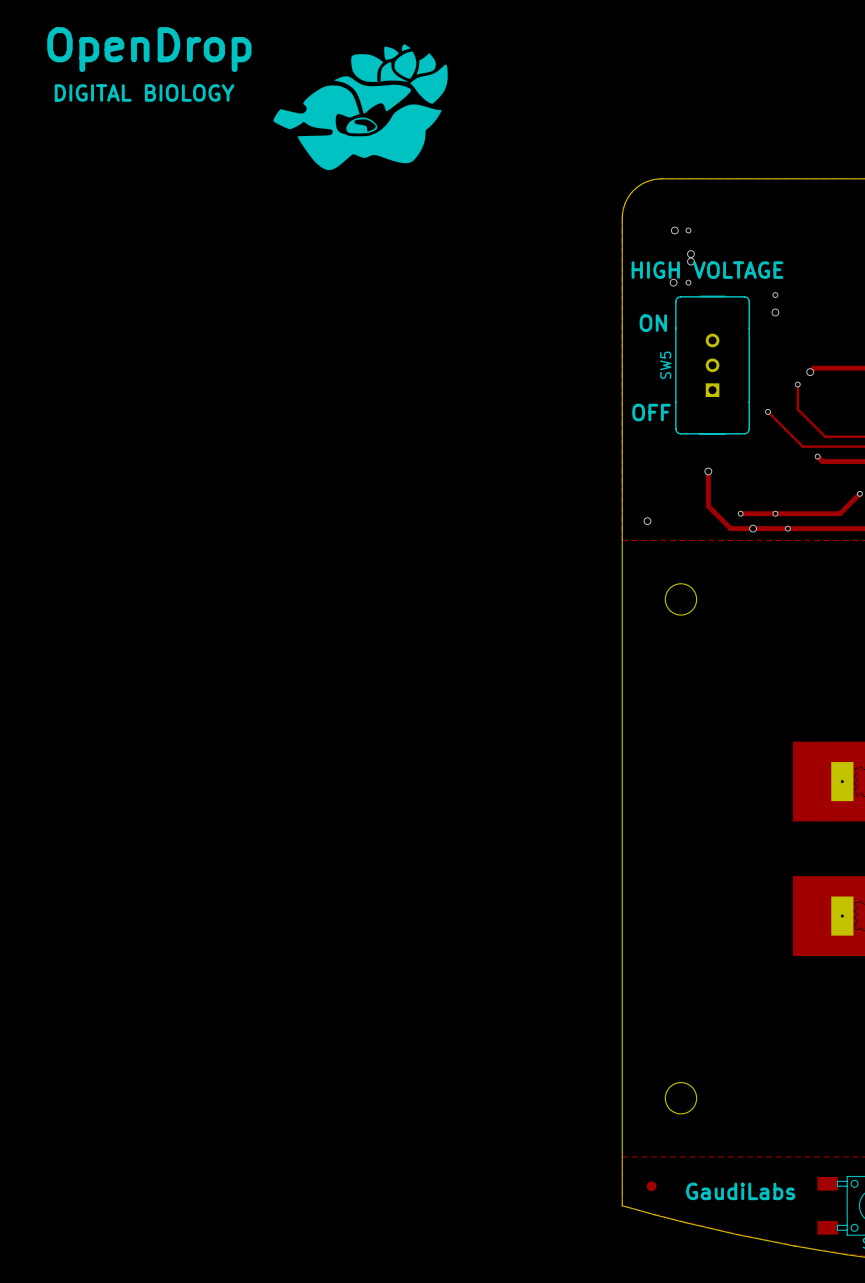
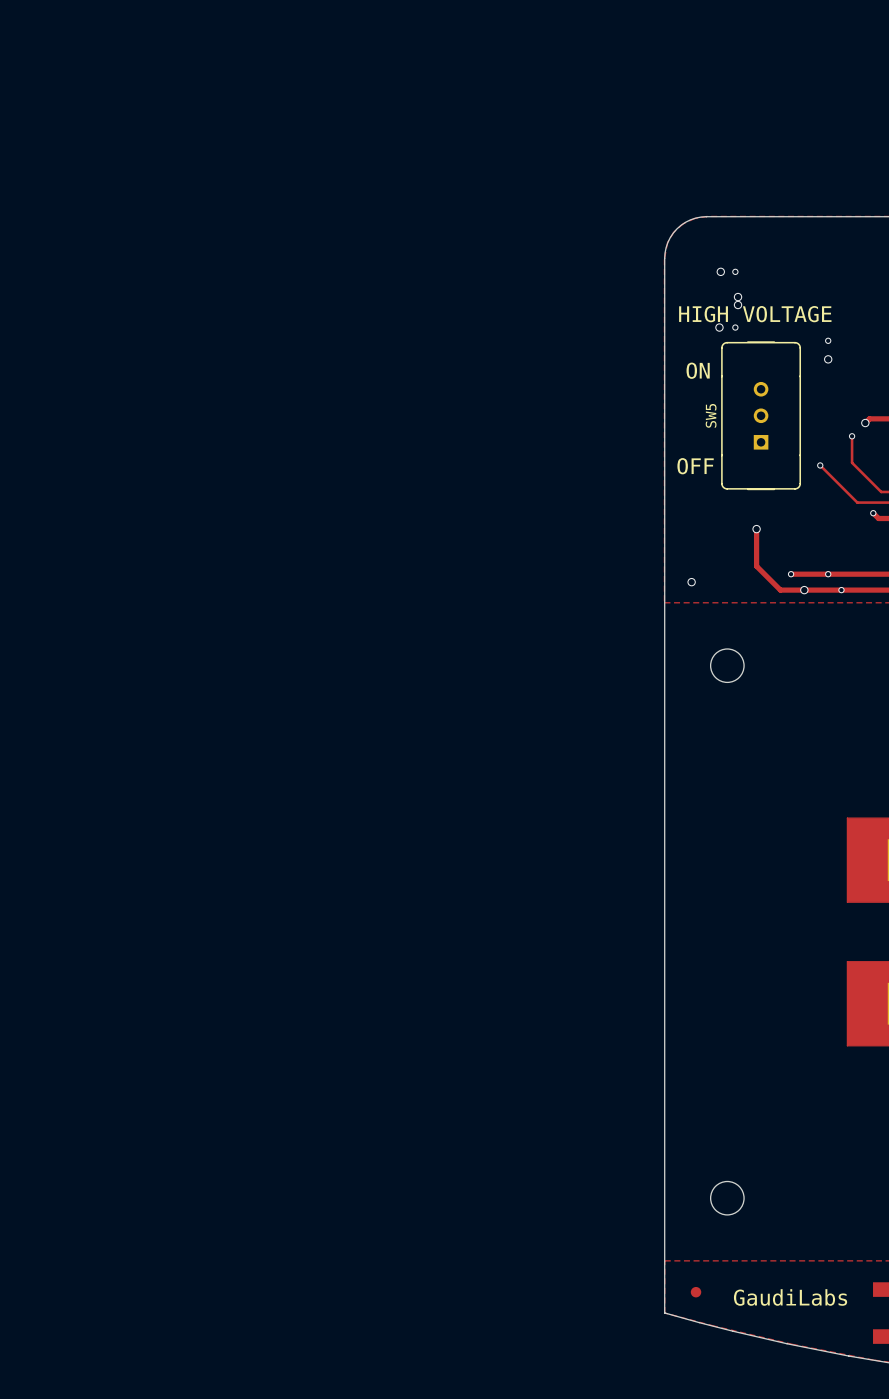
drawing: [273, 44, 448, 171] -> none
text: OpenDrop (149, 49) -> none
text: DIGITAL BIOLOGY (144, 92) -> none

